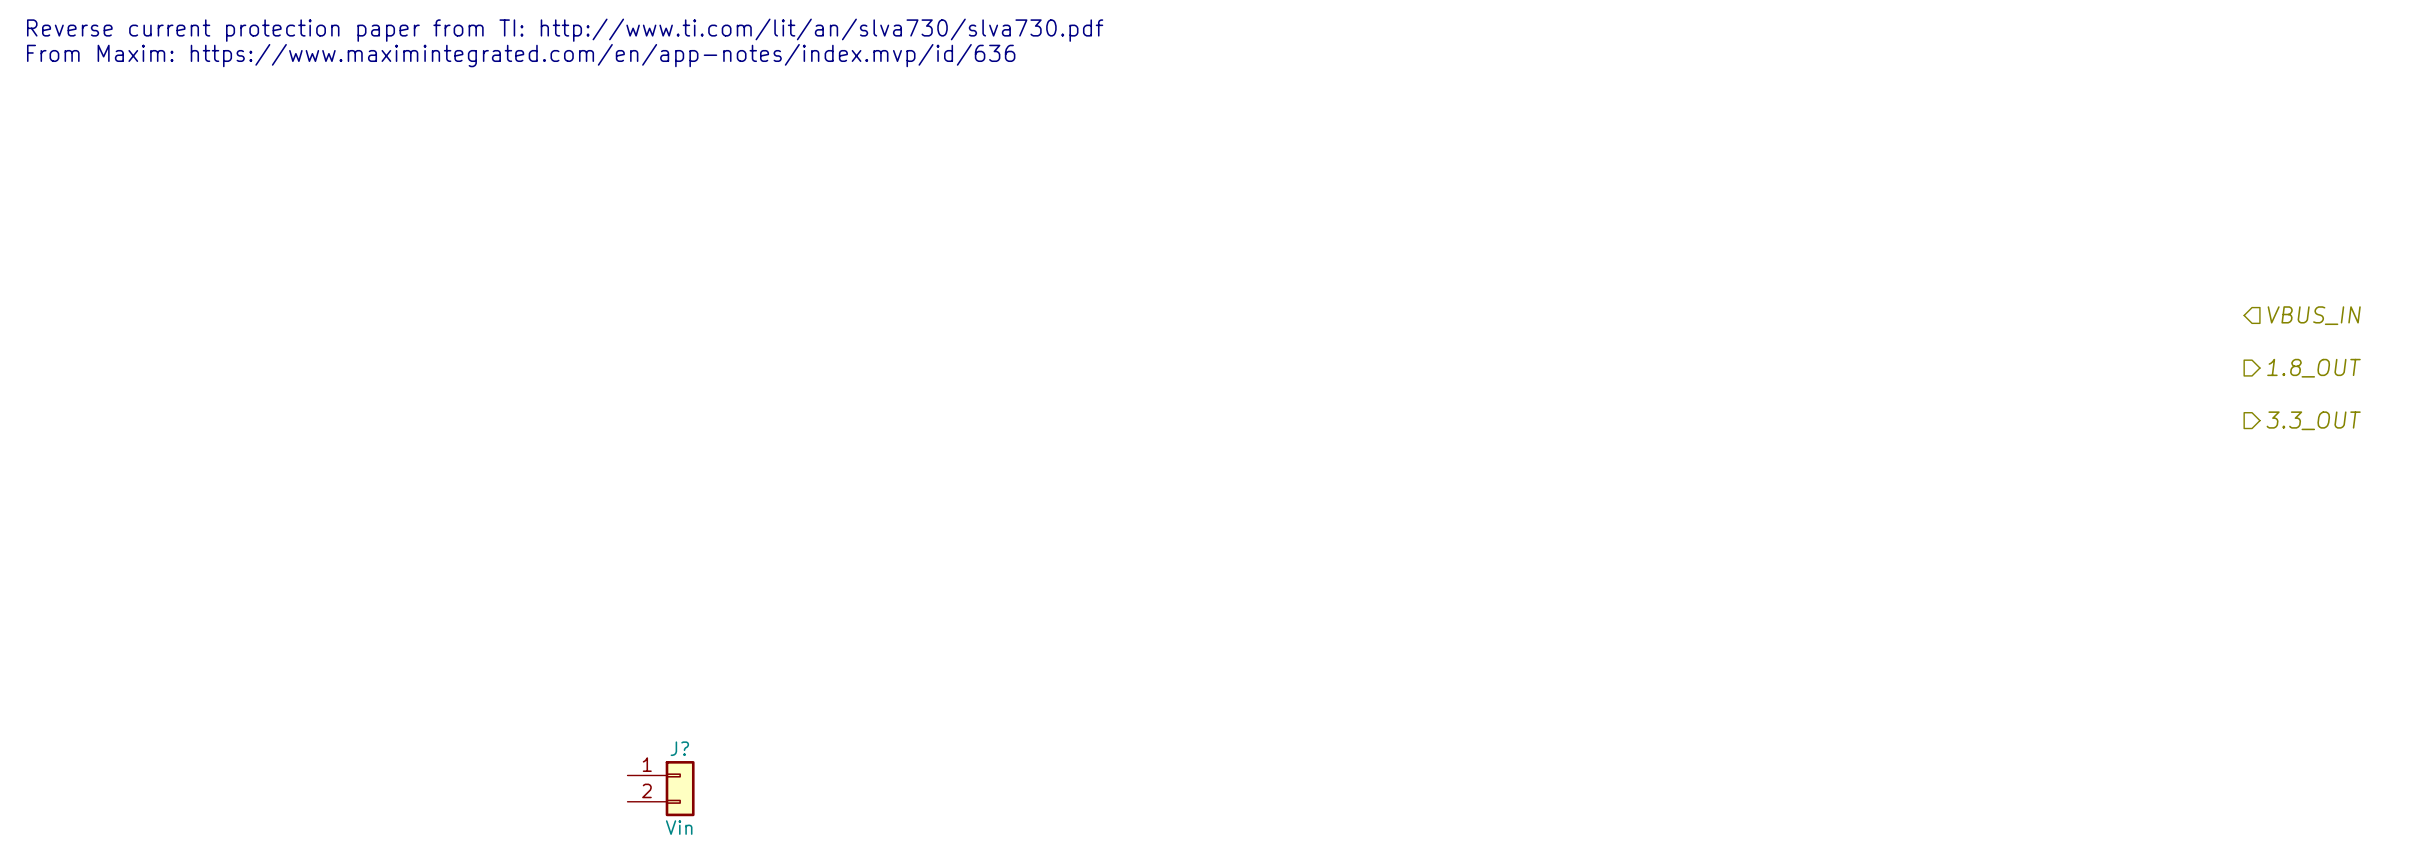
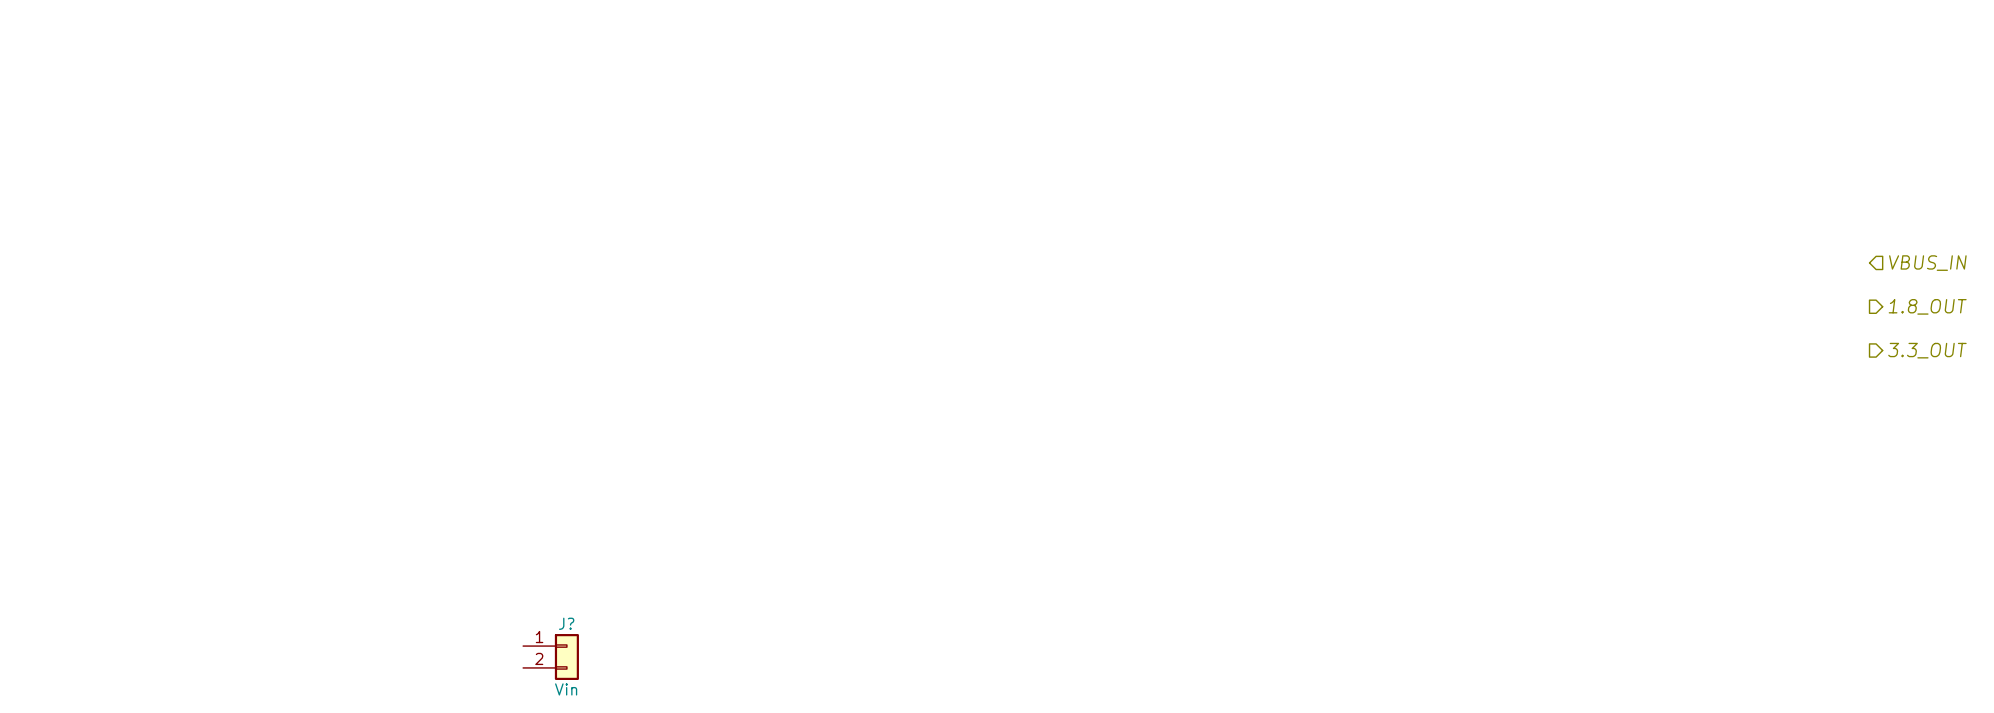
text: Reverse current protection paper from TI: http://www.ti.com/lit/an/slva730/slva730.pdf (565, 30) -> none
text: From Maxim: https://www.maximintegrated.com/en/app-notes/index.mvp/id/636 (521, 55) -> none

